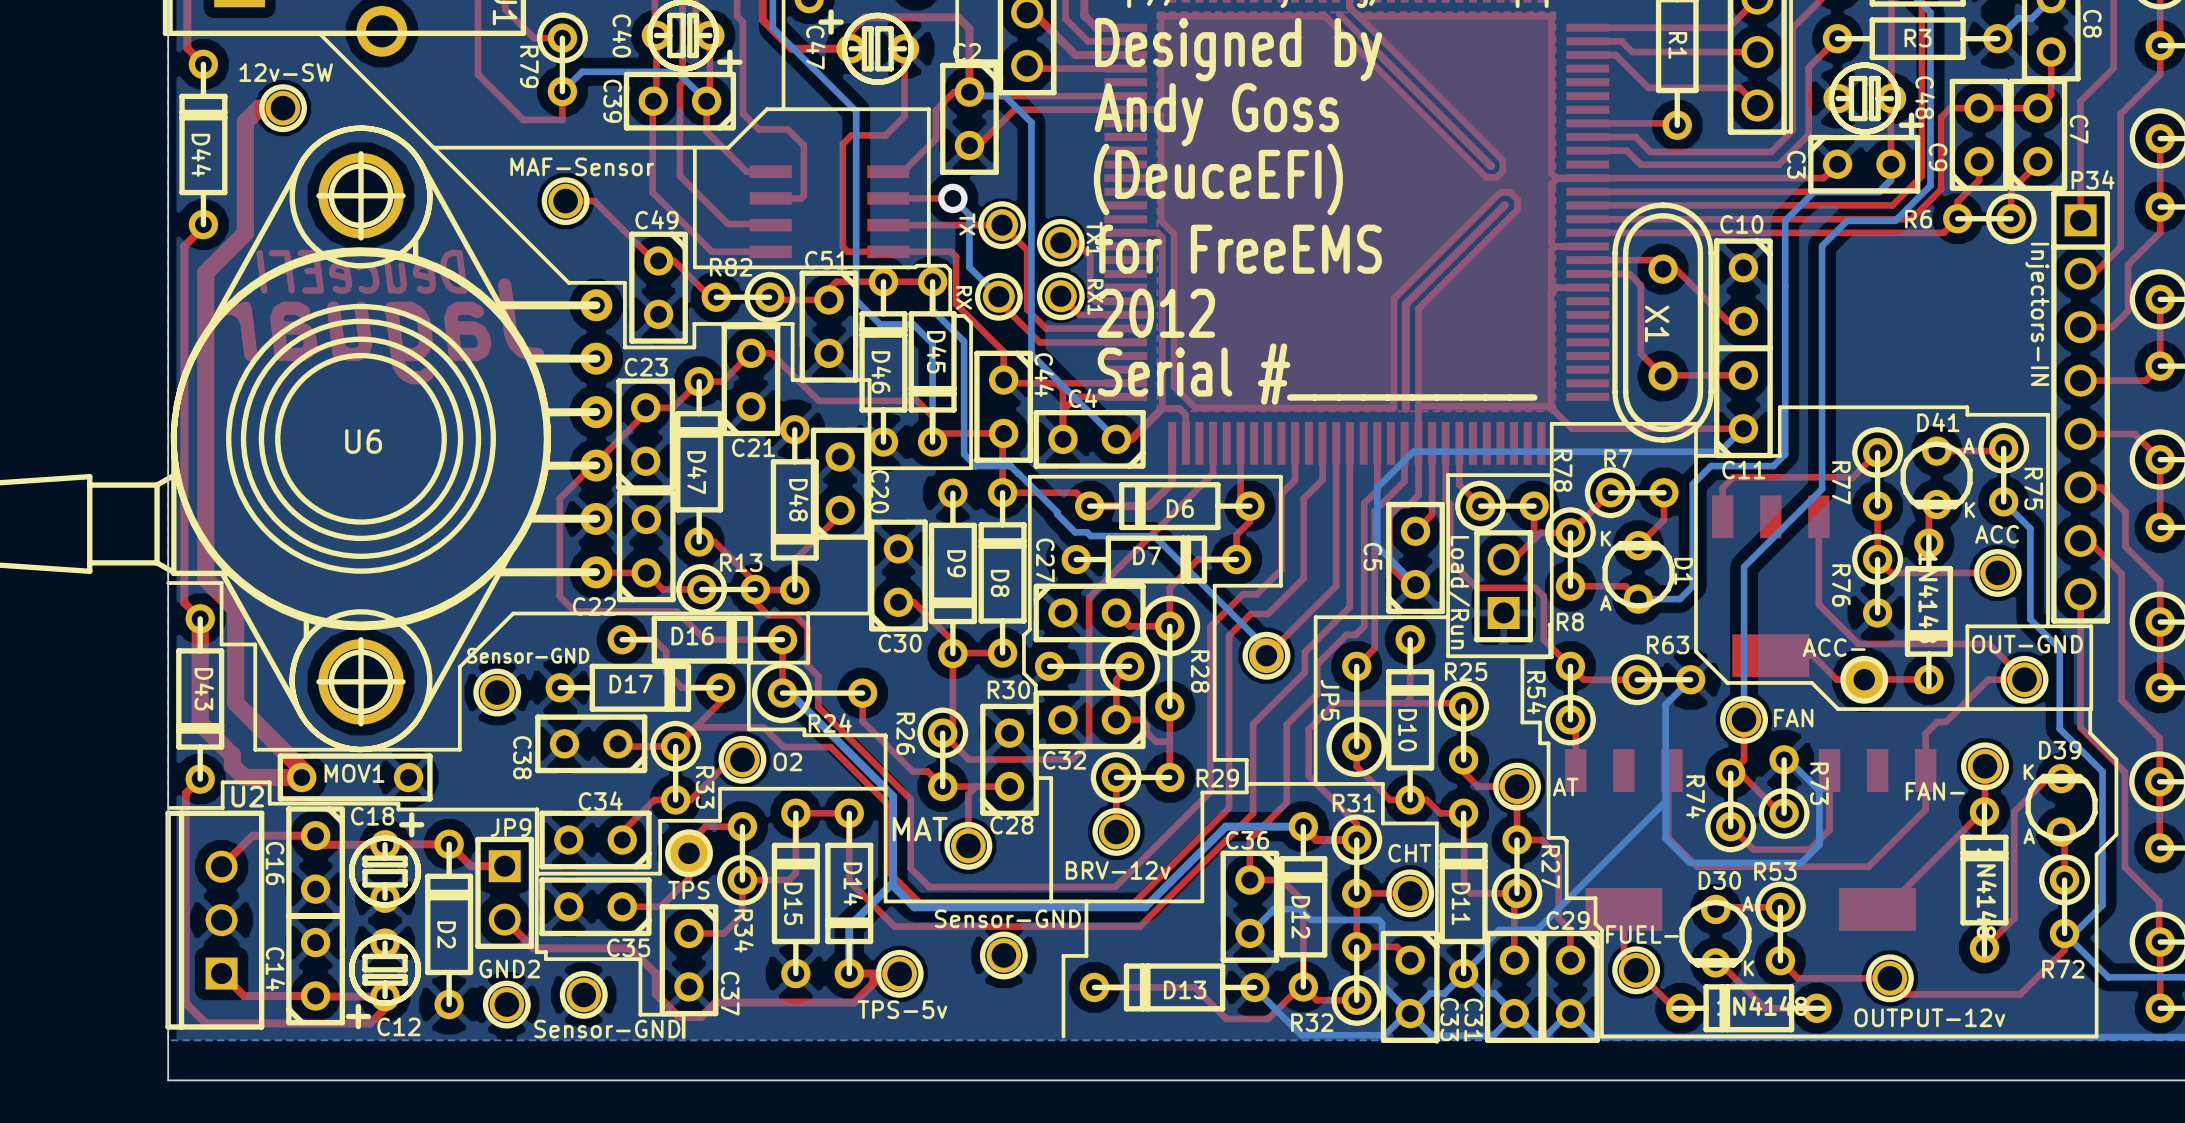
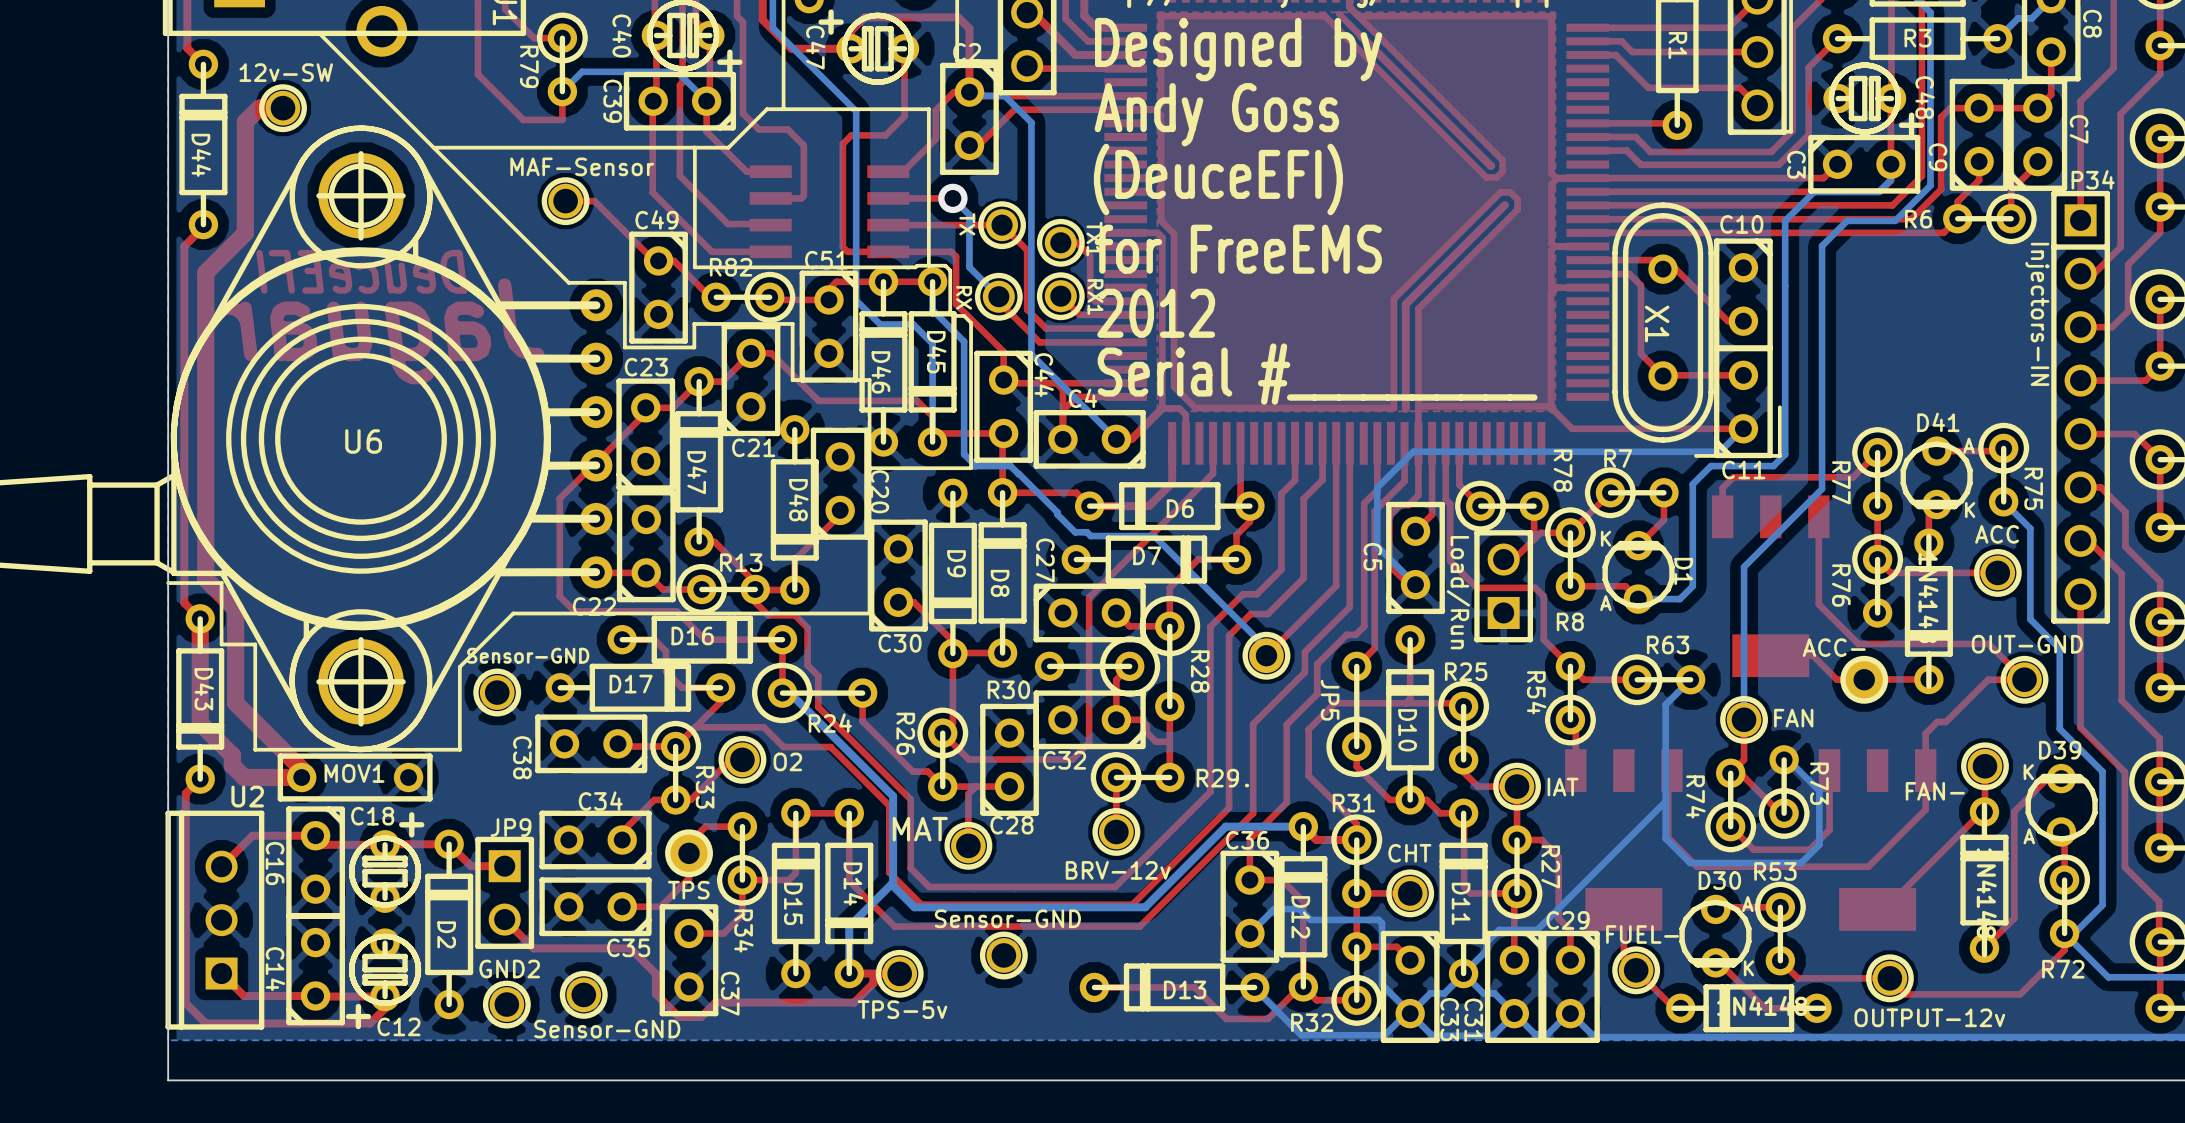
line: (1780, 407) (1967, 407) (1967, 414) (2048, 414) (2048, 626) -> none
line: (1551, 475) (1448, 475) (1448, 656) (1550, 656) (1549, 624) -> none
line: (808, 613) (808, 662) (748, 662) (748, 729) (804, 729) (804, 735) (885, 735) (885, 901) (1202, 901) (1202, 792) (1246, 792) (1246, 759) (1214, 759) (1214, 585) (1280, 585) (1280, 476) (1029, 476) (1029, 629) (1023, 635) (1023, 673) (1035, 685) (1035, 778) (1051, 778) (1051, 901) -> none
line: (1447, 617) (1315, 617) (1315, 783) -> none
line: (2090, 709) (2090, 733) (2116, 759) (2116, 834) (2096, 854) (2096, 1036) (1601, 1036) (1601, 930) (1595, 923) (1595, 898) (1566, 898) (1566, 841) (1563, 837) (1548, 837) (1548, 743) (1539, 743) (1539, 722) (1522, 722) (1522, 657) (1551, 657) (1551, 423) (1695, 423) (1695, 651) (1727, 682) (1811, 682) (1838, 709) (2091, 709) (2091, 626) (1967, 626) (1967, 709) -> none
line: (1246, 783) (1382, 783) (1382, 823) (1436, 823) (1436, 1041) -> none
line: (885, 788) (719, 788) (719, 820) (660, 820) (660, 873) (537, 873) (537, 809) (398, 809) (398, 803) (269, 803) (269, 782) (222, 782) (222, 807) (169, 807) -> none
line: (536, 809) (536, 952) (545, 952) (545, 959) (640, 959) (640, 1014) (683, 1014) (683, 1037) -> none
line: (1086, 901) (1086, 955) (1063, 955) (1063, 1036) -> none

